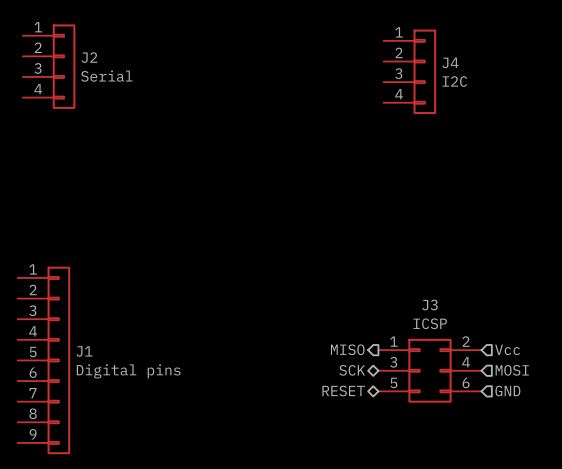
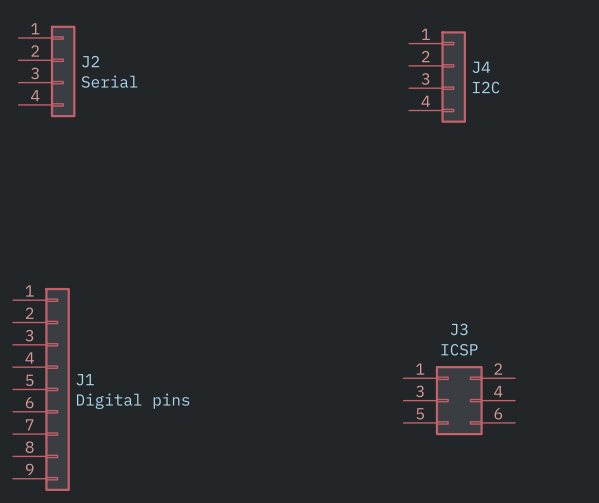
hierarchical label: MISO (347, 349) -> none
hierarchical label: Vcc (507, 349) -> none
hierarchical label: SCK (352, 370) -> none
hierarchical label: MOSI (512, 370) -> none
hierarchical label: RESET (343, 390) -> none
hierarchical label: GND (507, 390) -> none

